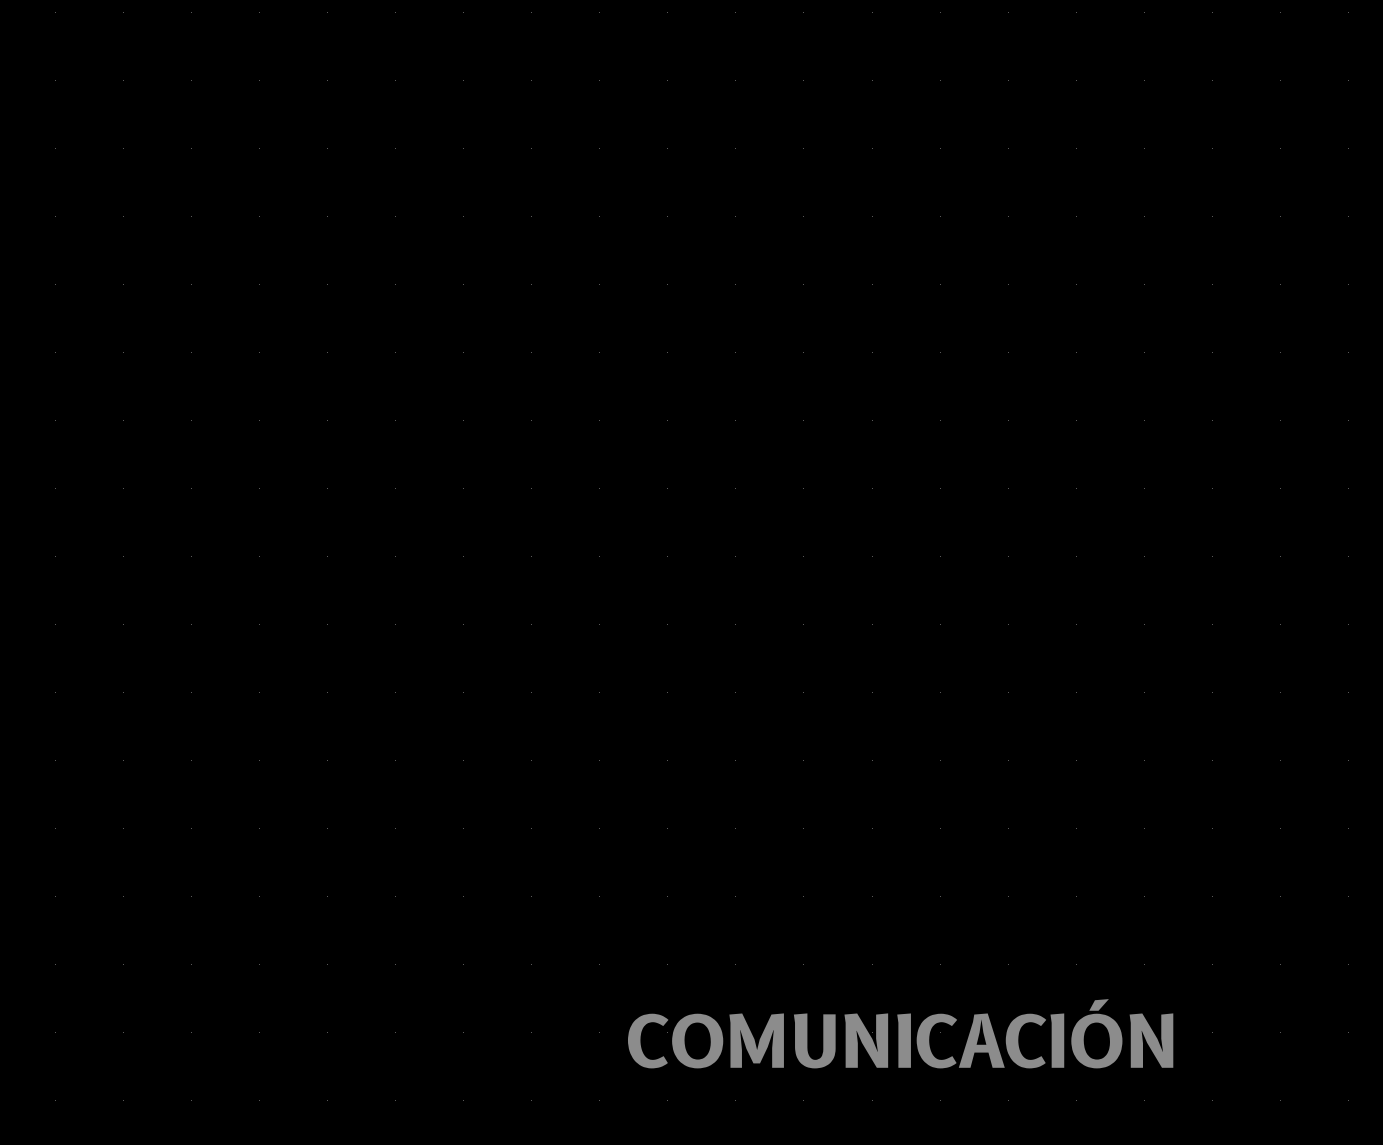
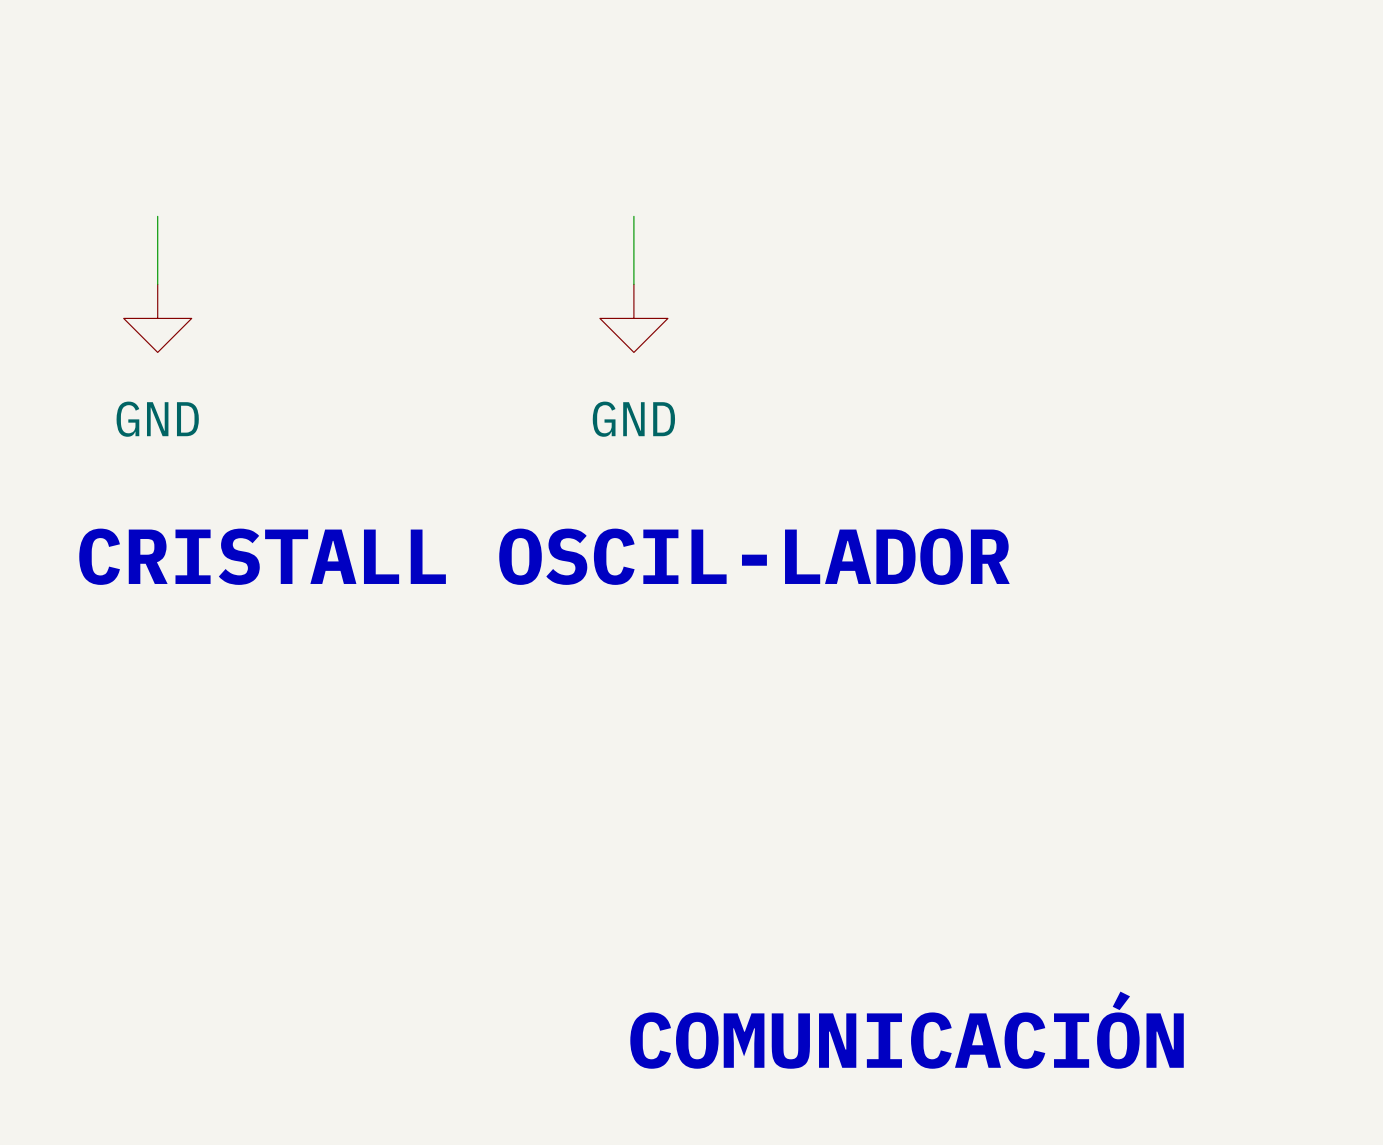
wire: none -> (157, 216) (157, 284)
wire: none -> (633, 216) (633, 284)
power symbol: none -> GND (157, 318)
power symbol: none -> GND (633, 318)
text: none -> CRISTALL OSCIL-LADOR (544, 556)

